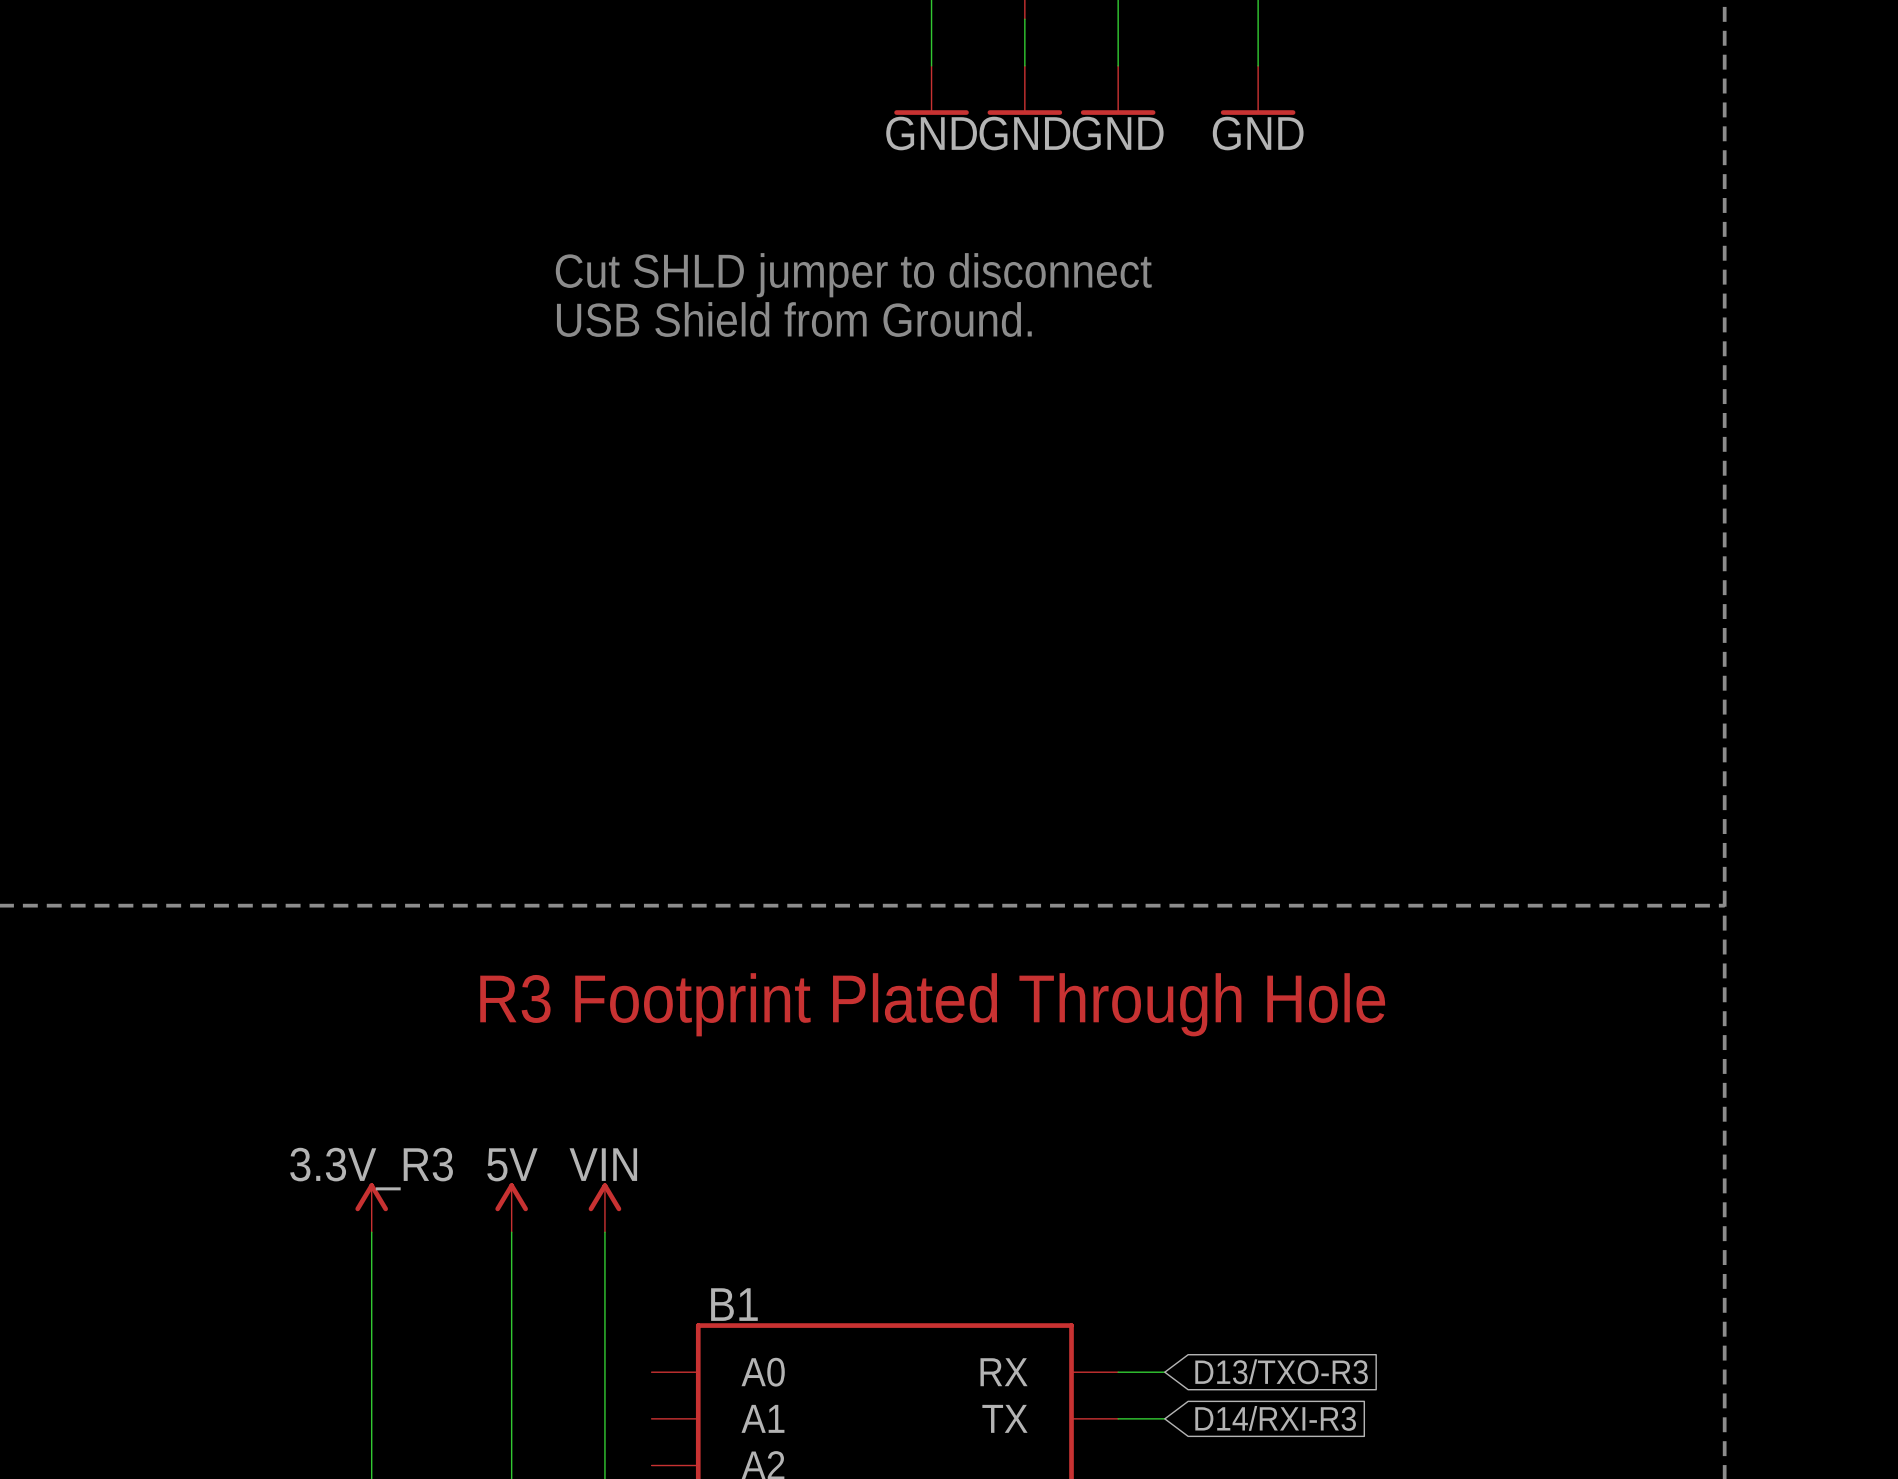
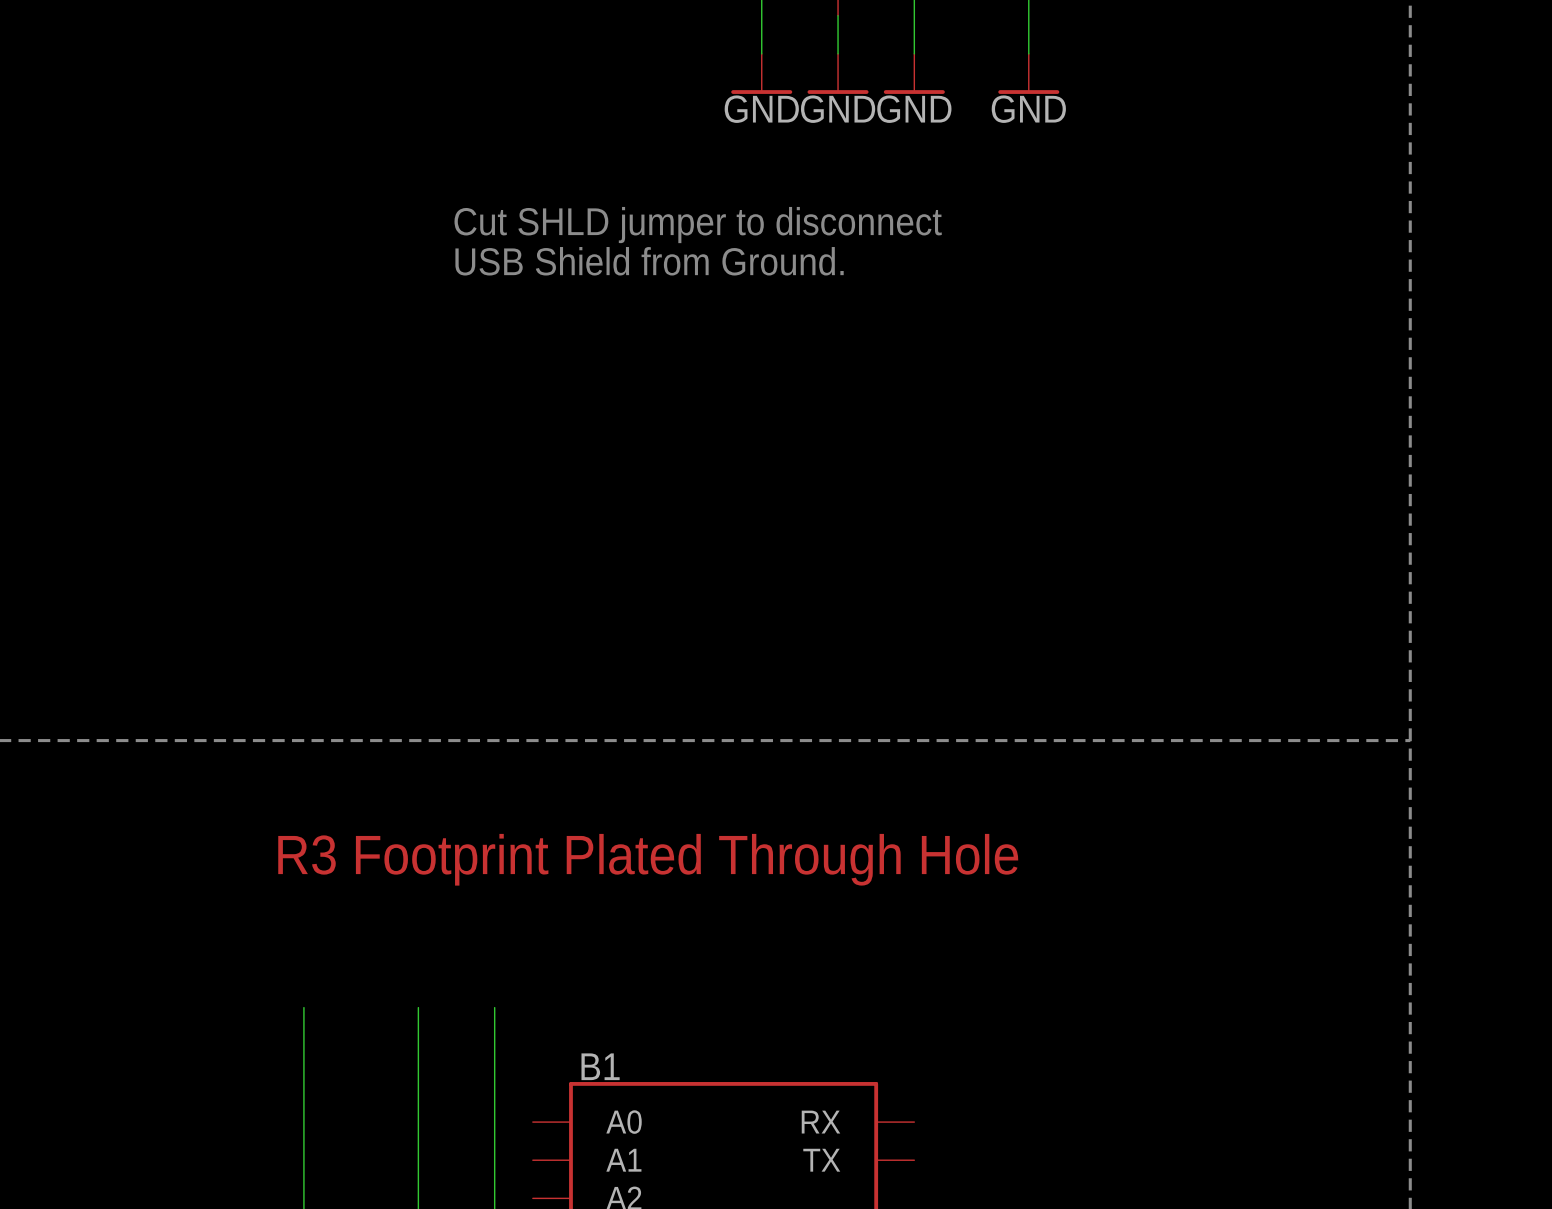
text position: R3 Footprint Plated Through Hole (932, 1004) -> R3 Footprint Plated Through Hole (648, 859)
power symbol: 3.3V_R3 (371, 1207) -> none
power symbol: 5V (511, 1207) -> none
power symbol: VIN (604, 1207) -> none
global label: D13/TXO-R3 (1281, 1371) -> none
wire: (1118, 1372) (1164, 1372) -> none
wire: (1118, 1418) (1164, 1418) -> none
global label: D14/RXI-R3 (1275, 1418) -> none

